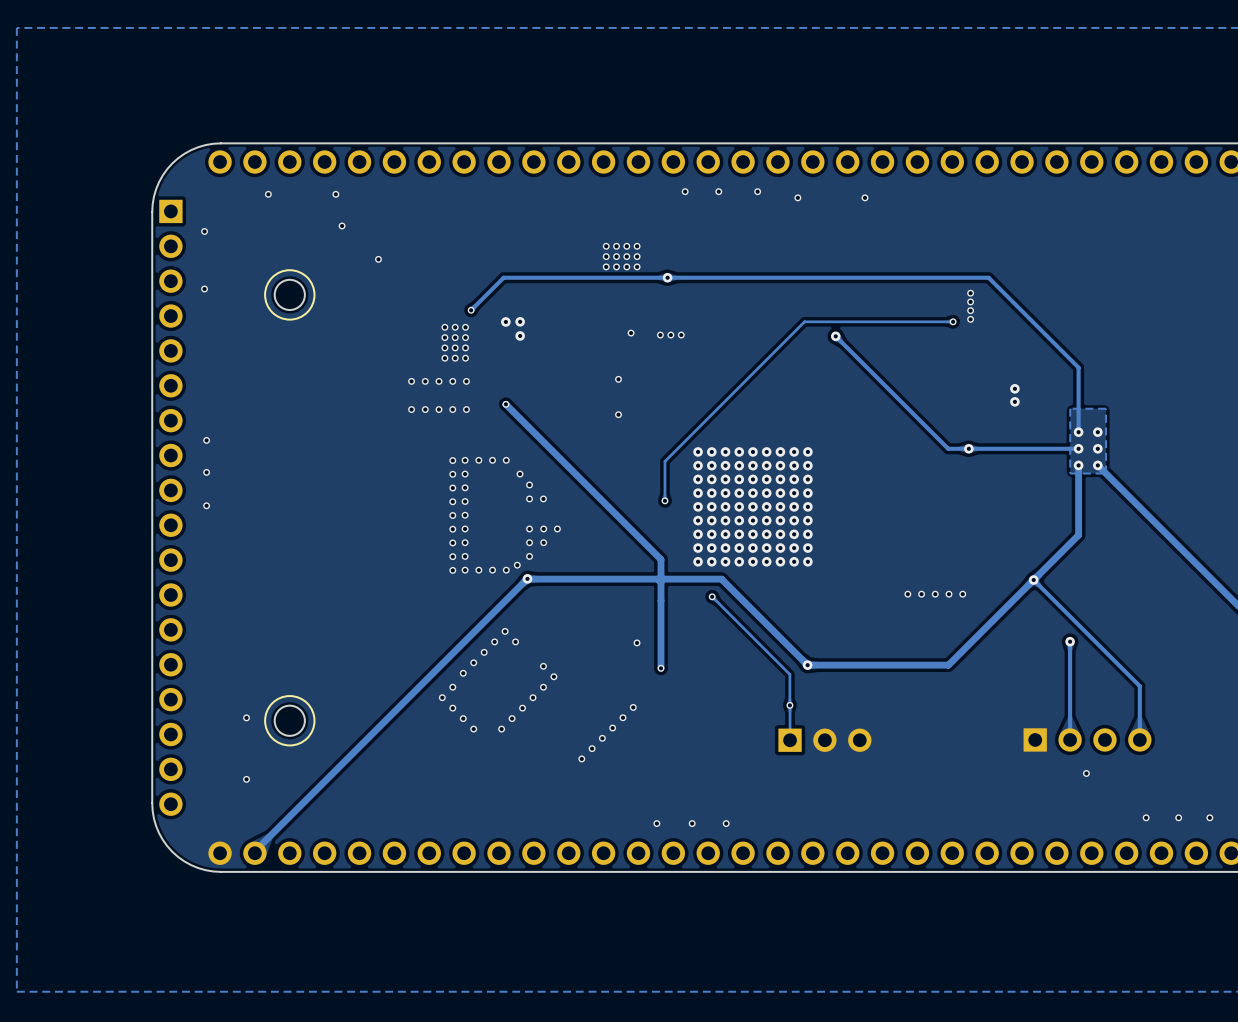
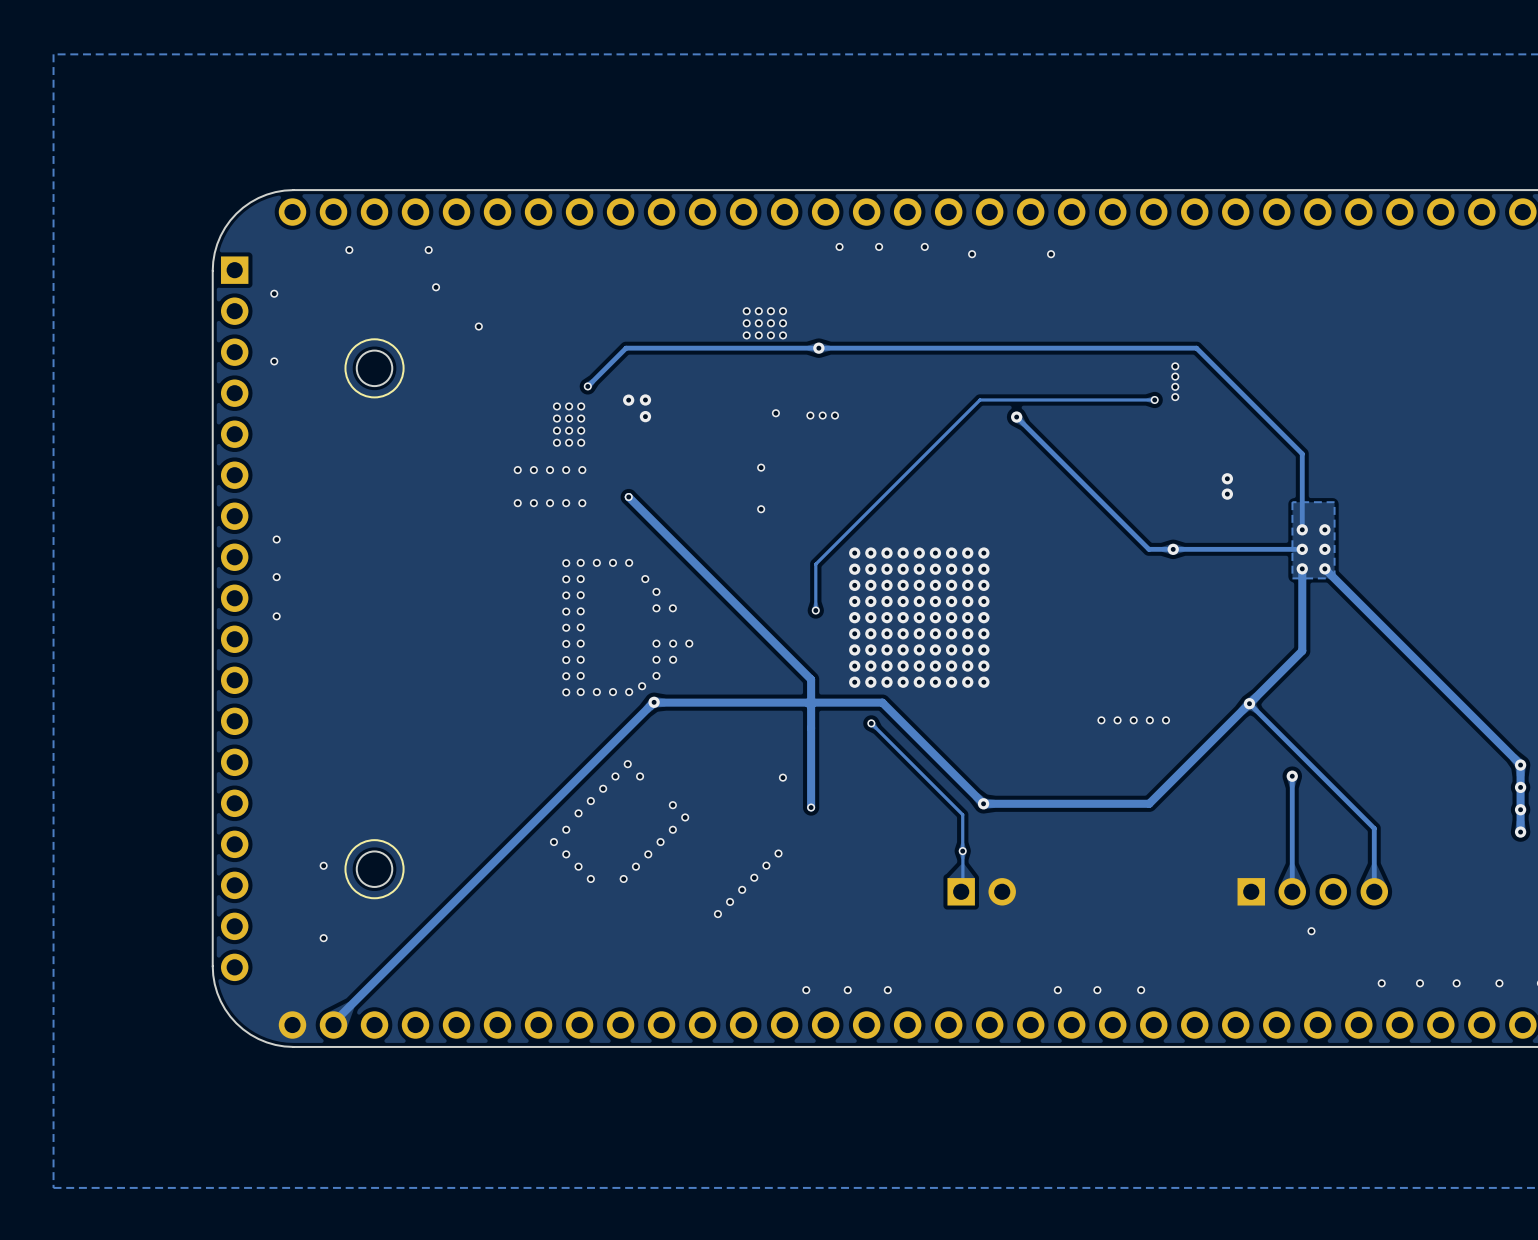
part: none -> (981, 891)
part: (824, 740) -> none
via: none -> (1057, 990)
via: none -> (1097, 990)
via: none -> (1141, 990)

